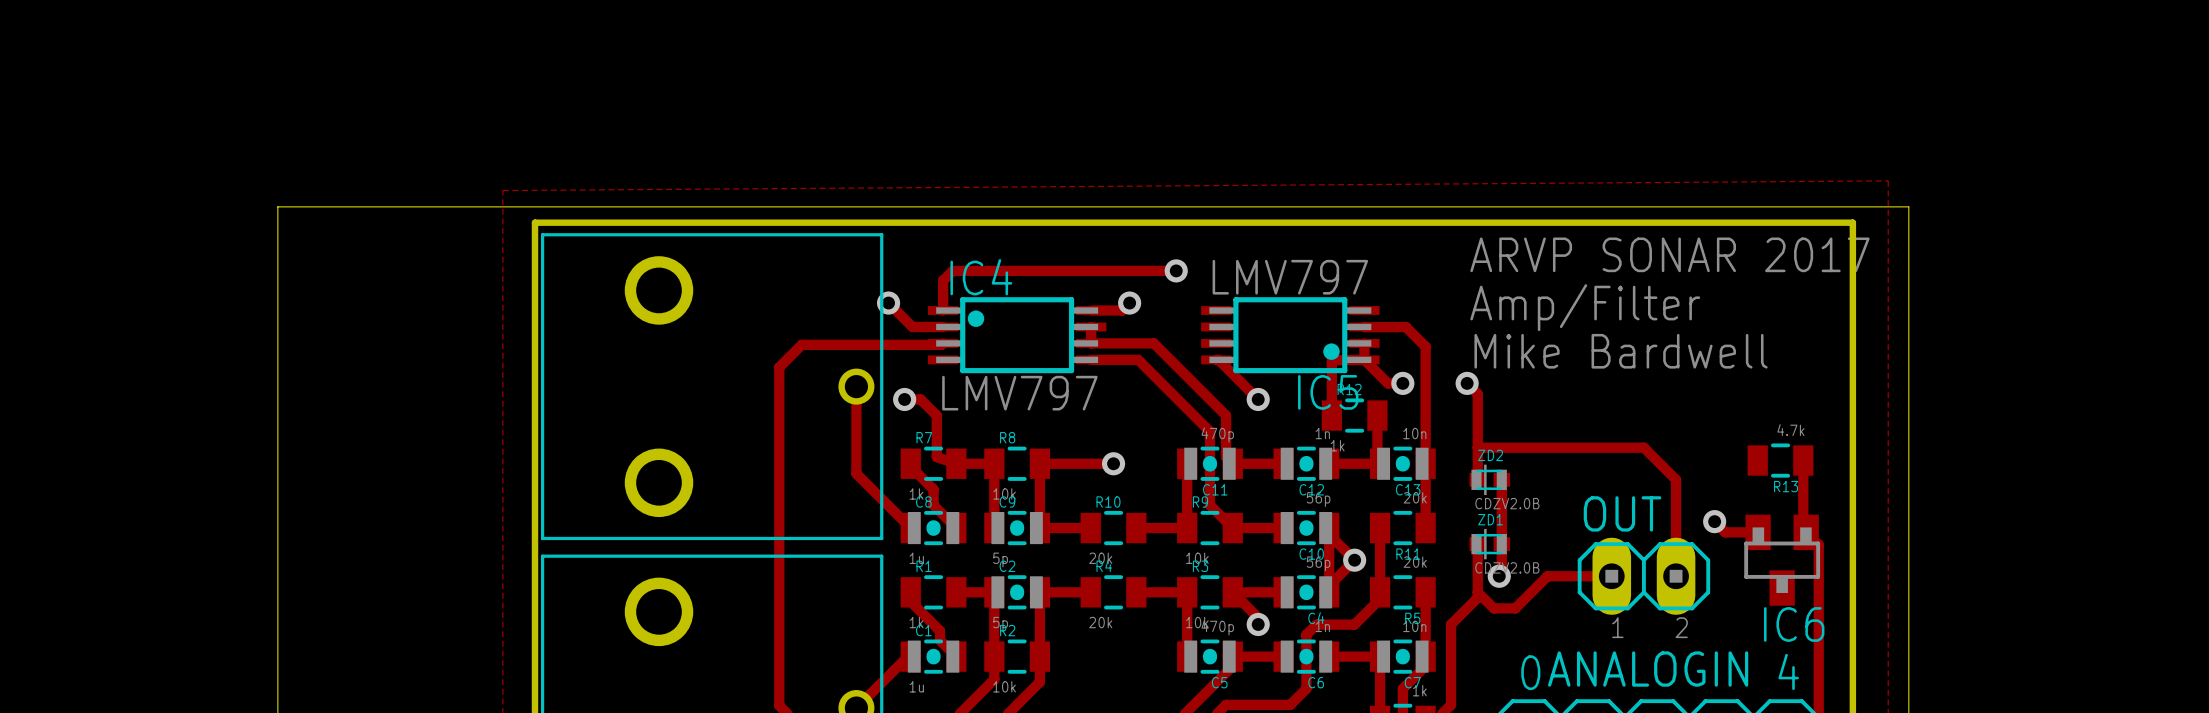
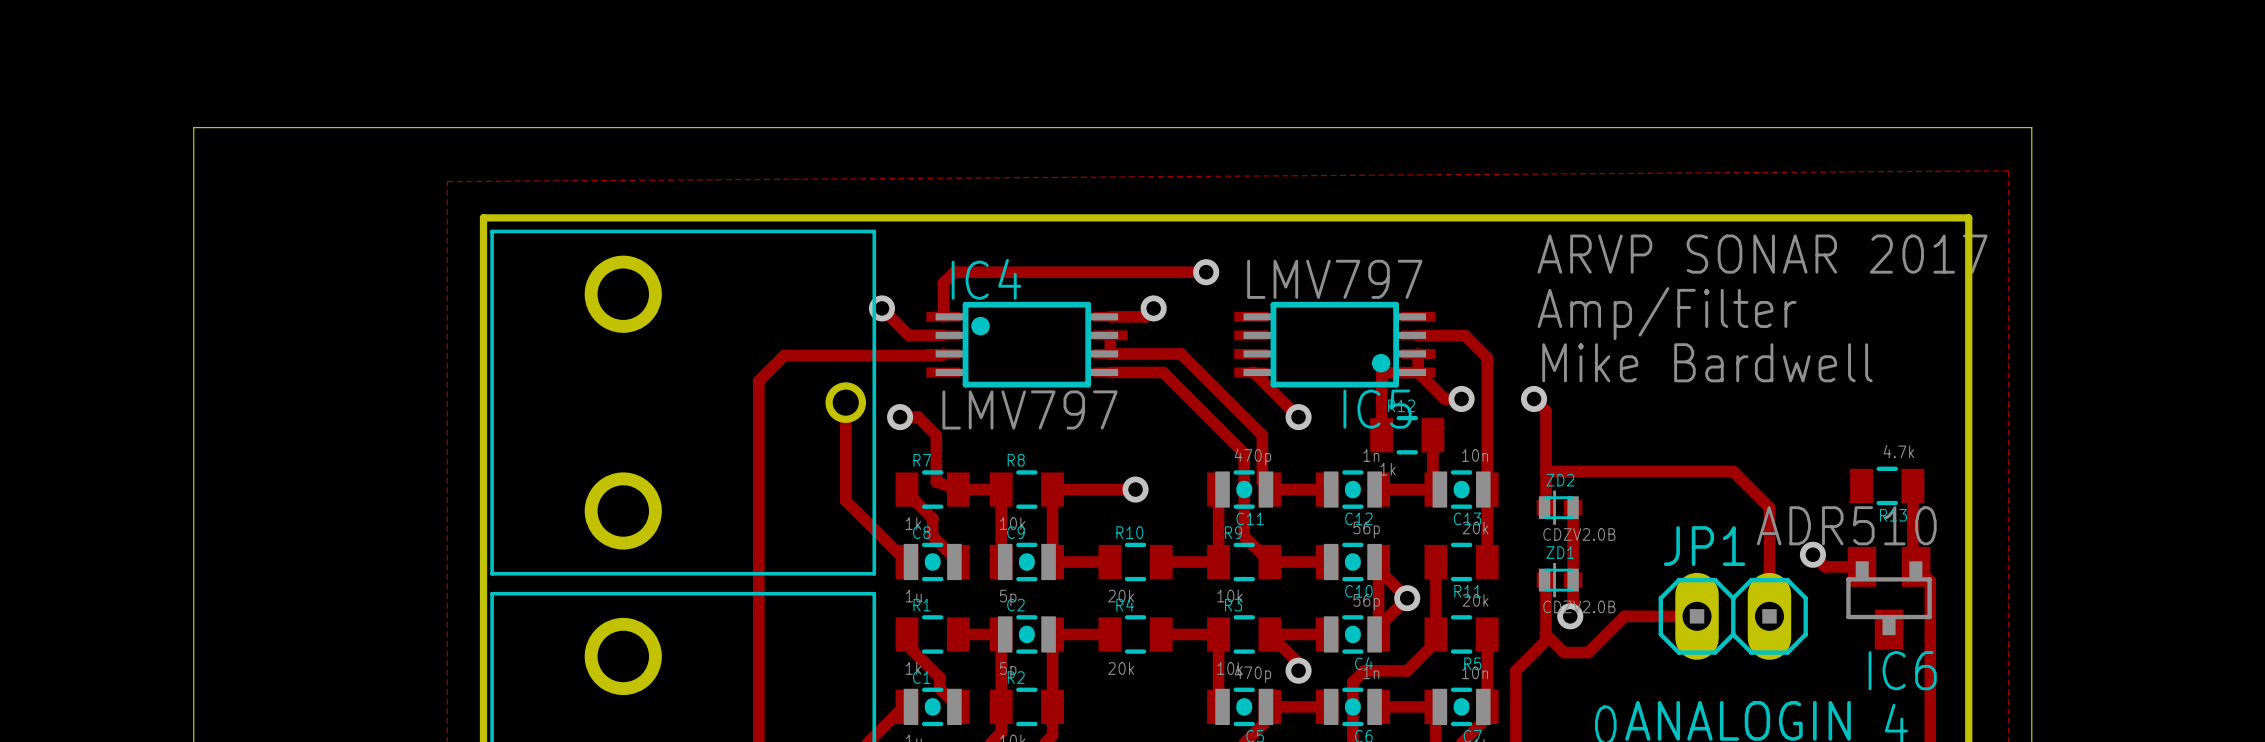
board edge: (277, 206) (1908, 206) -> (193, 200) (193, 127) (2031, 127) (2031, 200)
IC6 value: none -> ADR510 (1846, 525)
OUT name: OUT (1622, 513) -> JP1 (1704, 546)
text: 1 (1617, 627) -> none
text: 2 (1681, 627) -> none

